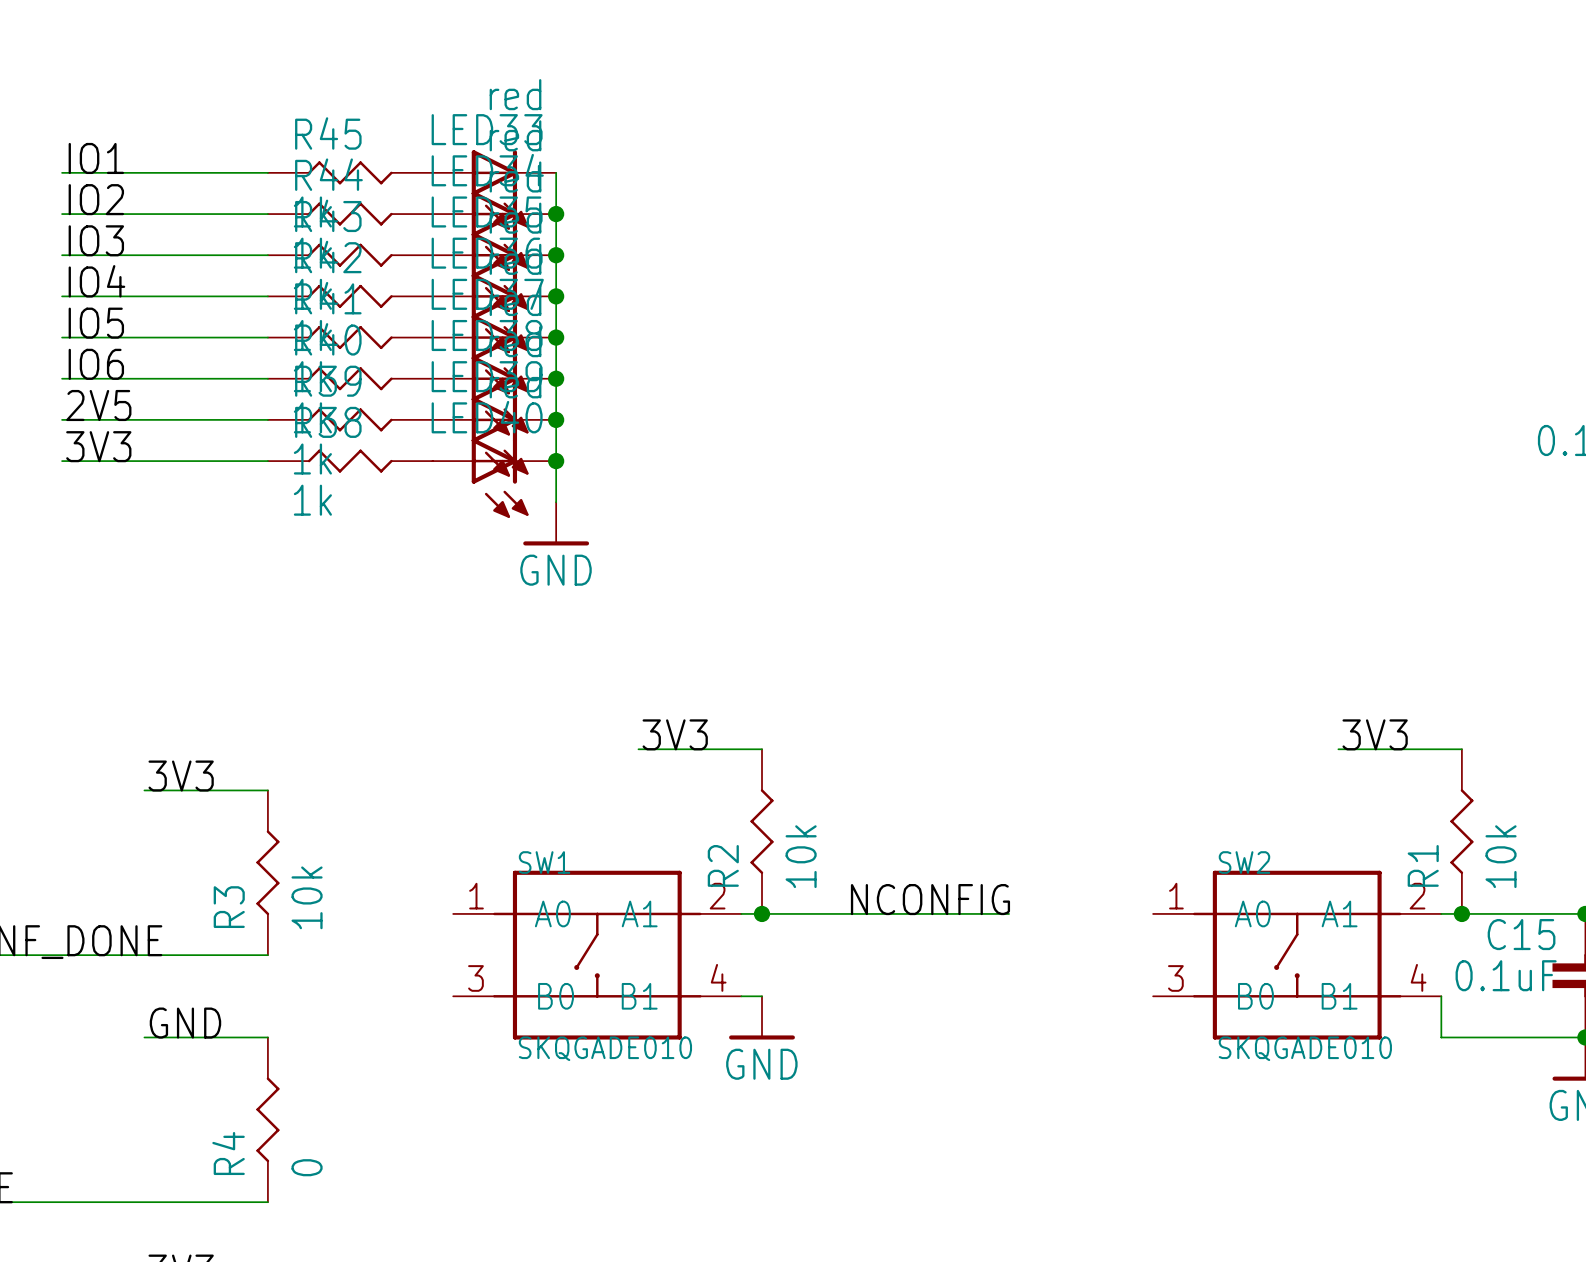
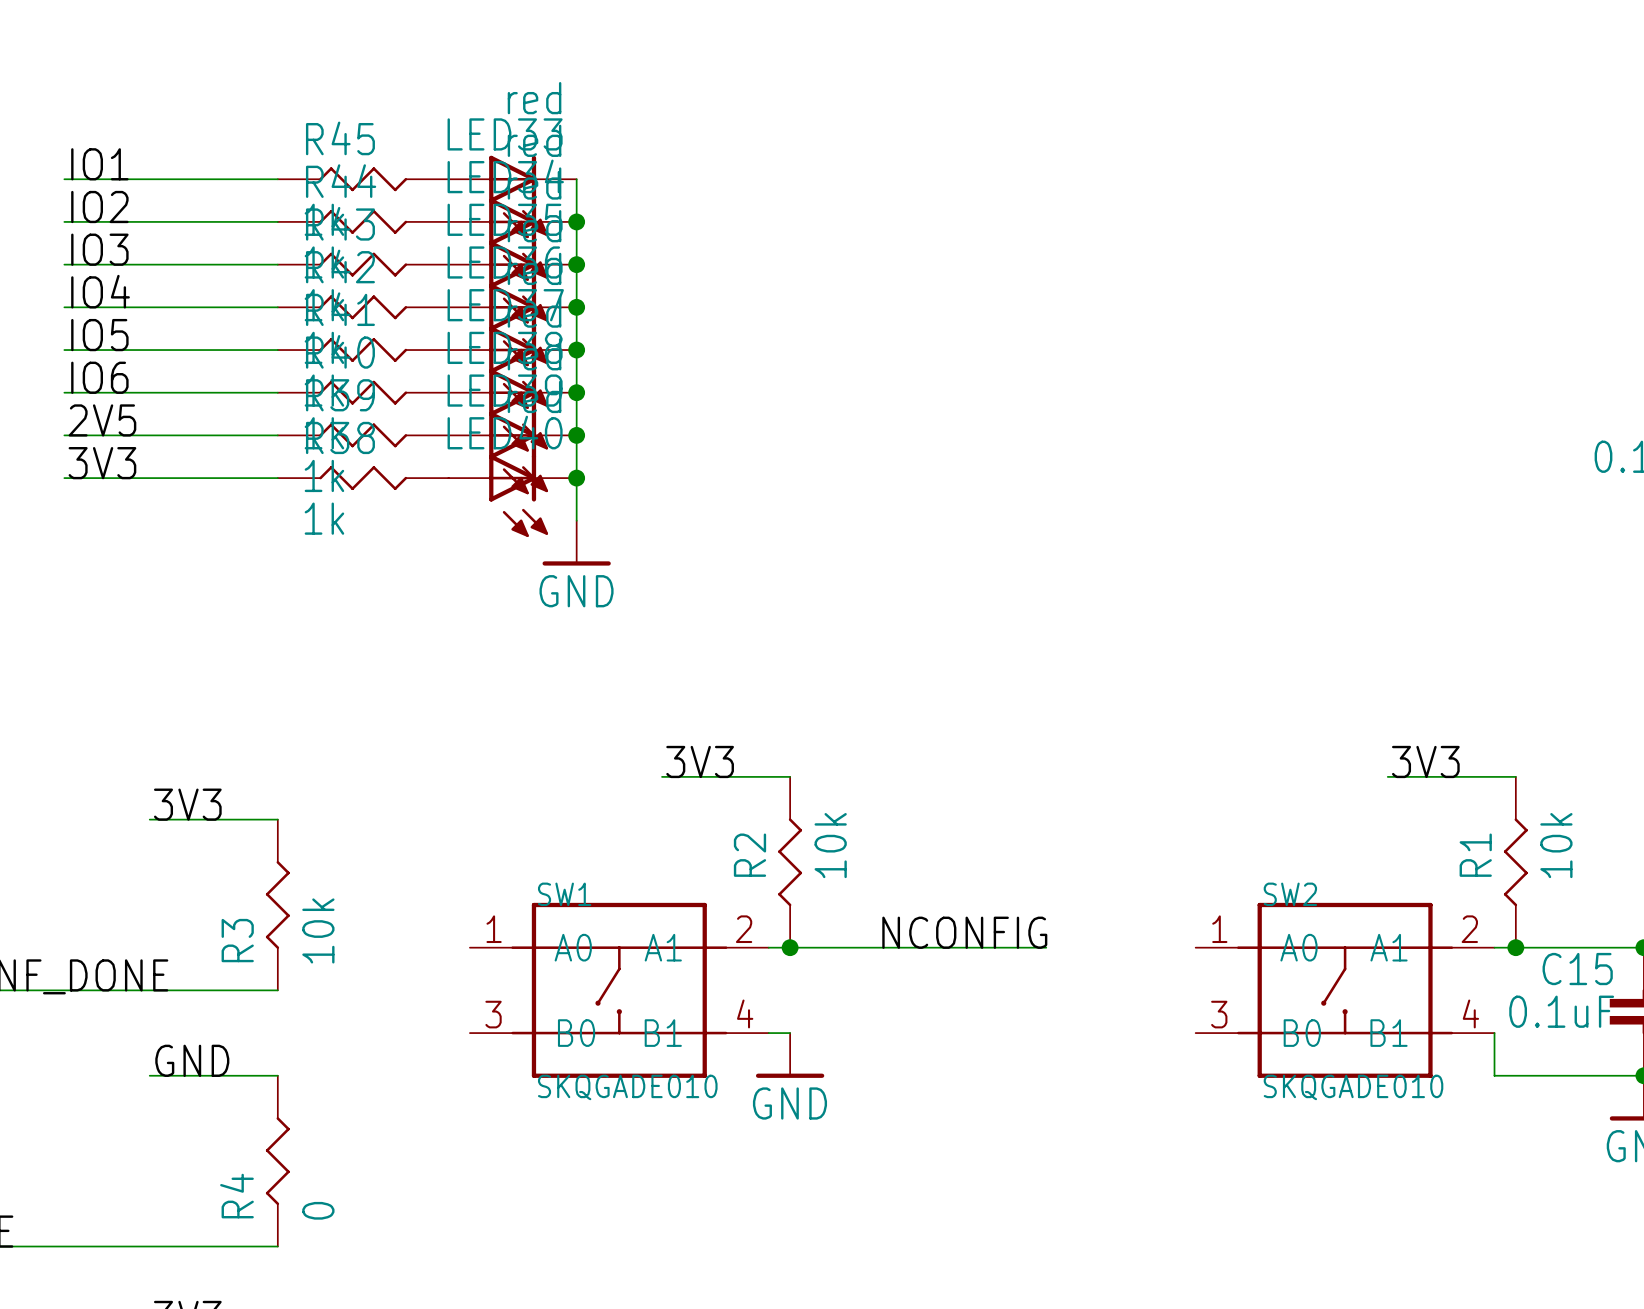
R2 value position: 10k (801, 856) -> 10k (830, 845)
R1 value position: 10k (1501, 856) -> 10k (1556, 845)
R2 name position: R2 (723, 865) -> R2 (749, 855)
R1 name position: R1 (1423, 865) -> R1 (1475, 855)

